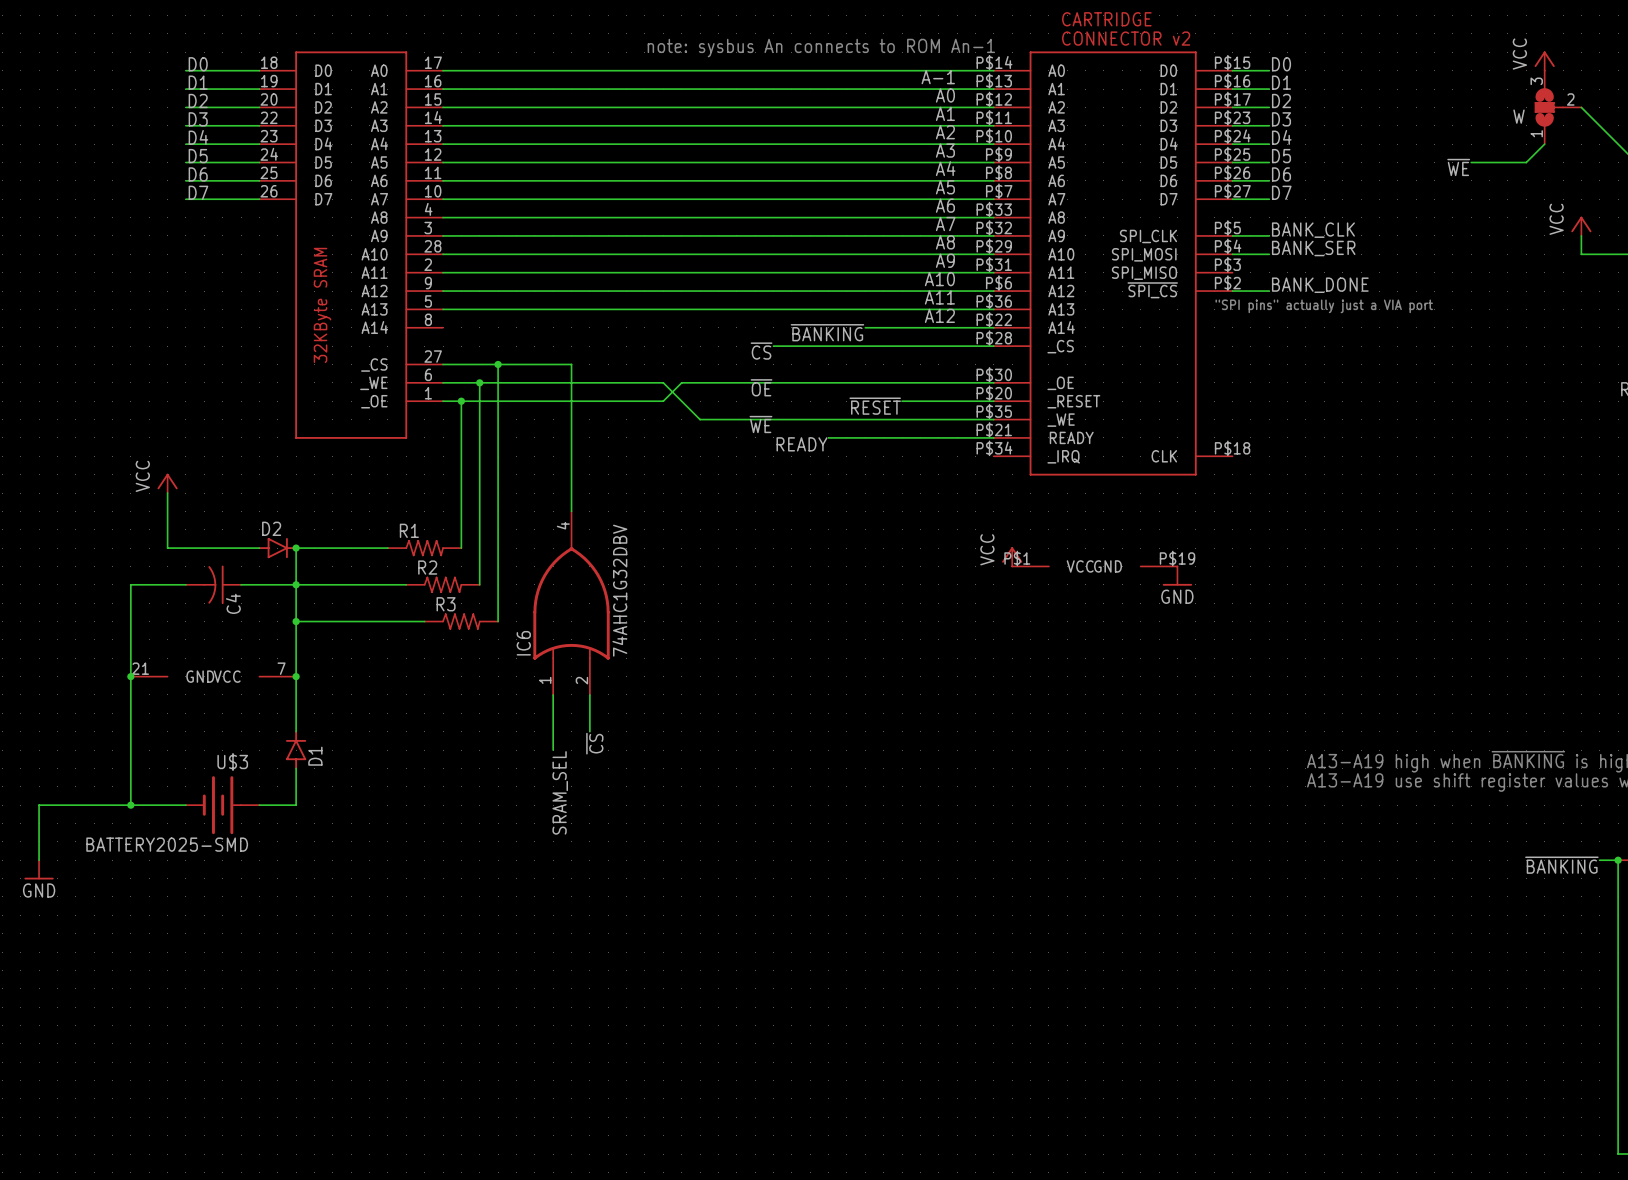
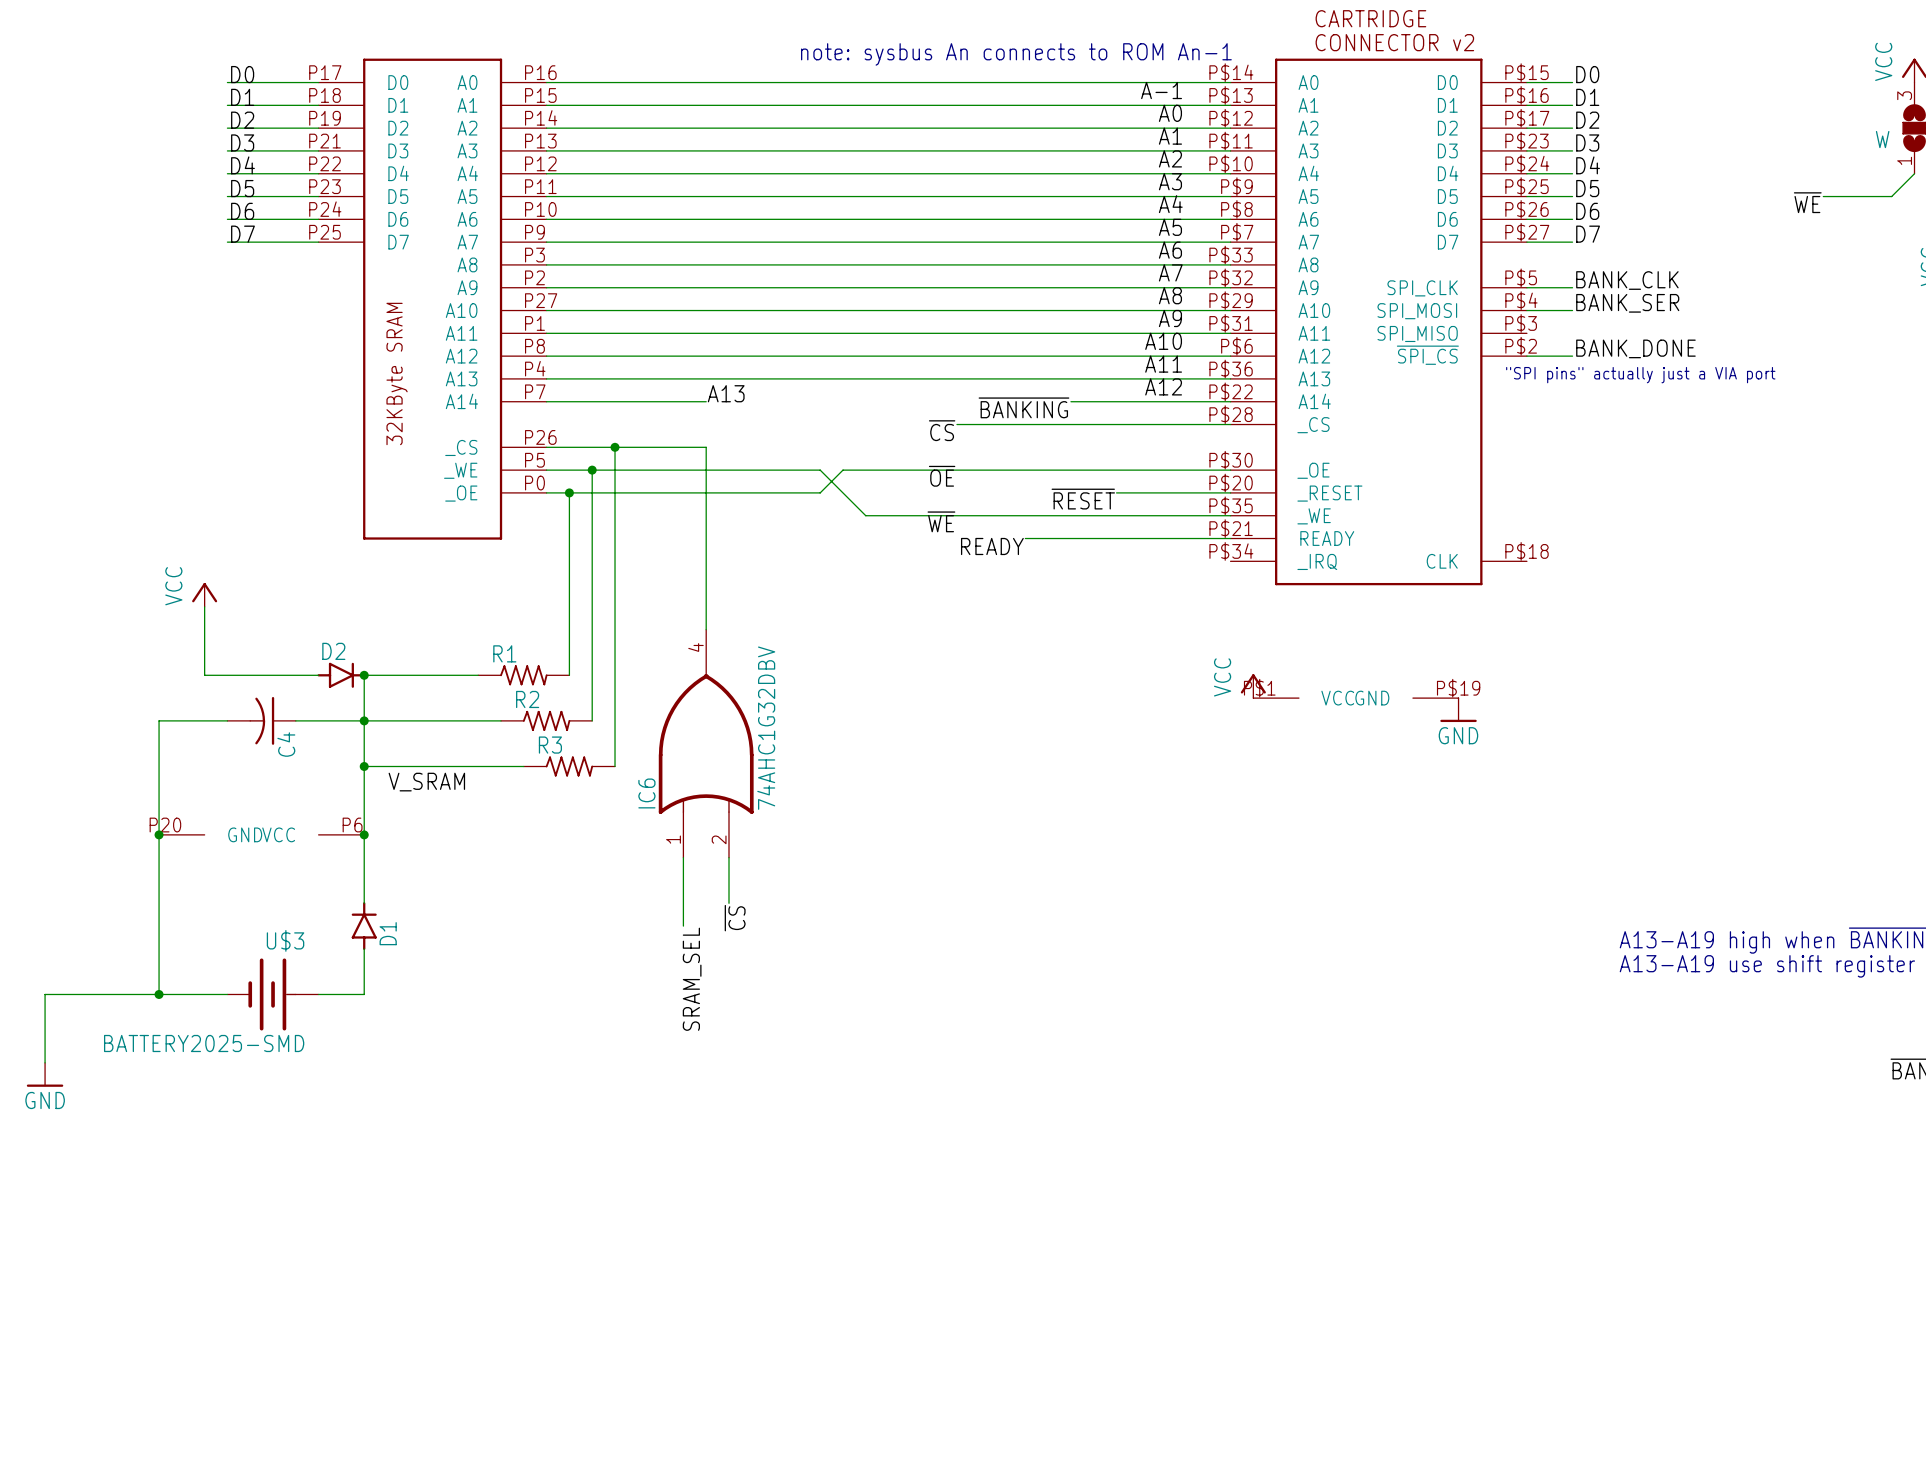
part symbol: [259, 51, 444, 439] -> [318, 58, 547, 540]
label: none -> A13 (726, 393)
wire: none -> (546, 401) (706, 401)
label: none -> V_SRAM (426, 782)
part pin number: 21 (140, 668) -> P20 (165, 825)
part pin number: 7 (281, 668) -> P6 (352, 825)

